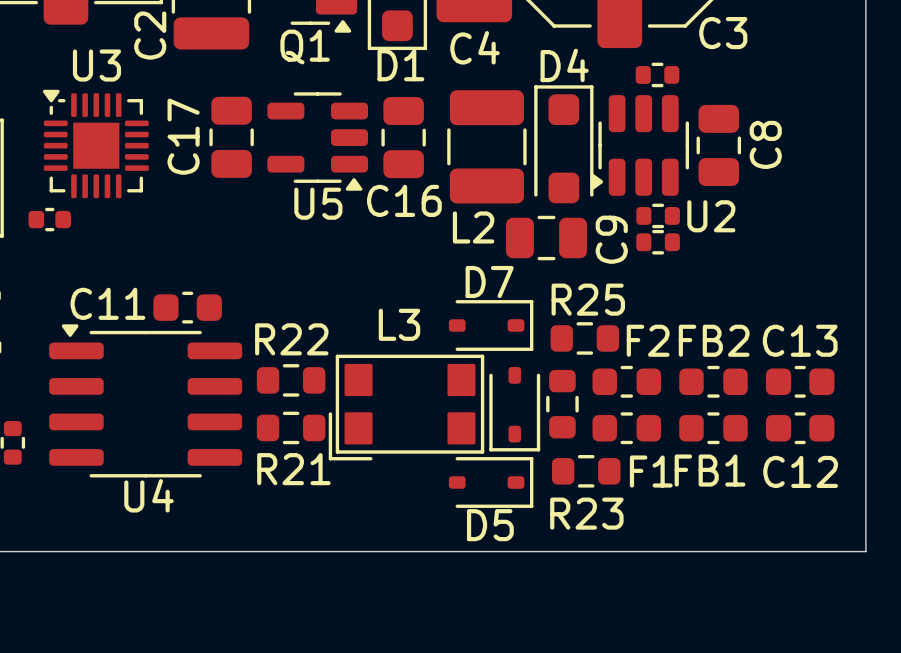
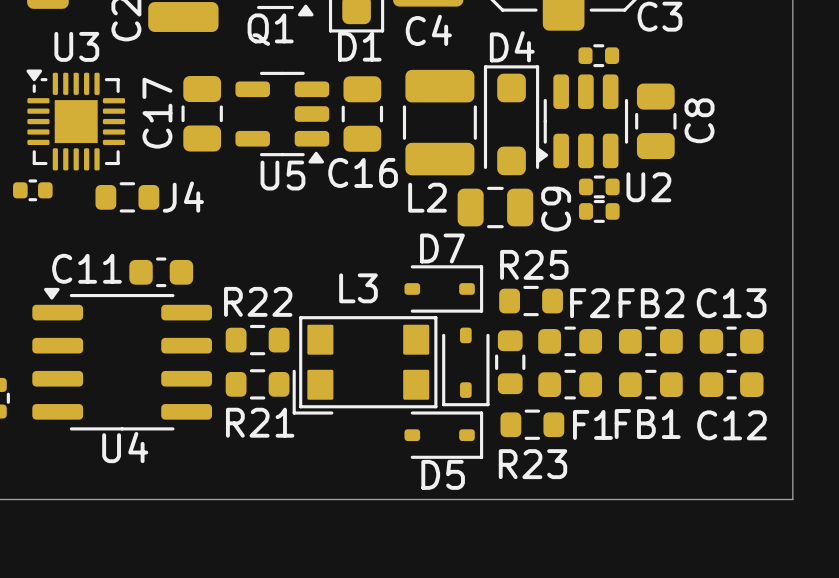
J4: none -> (127, 197)

